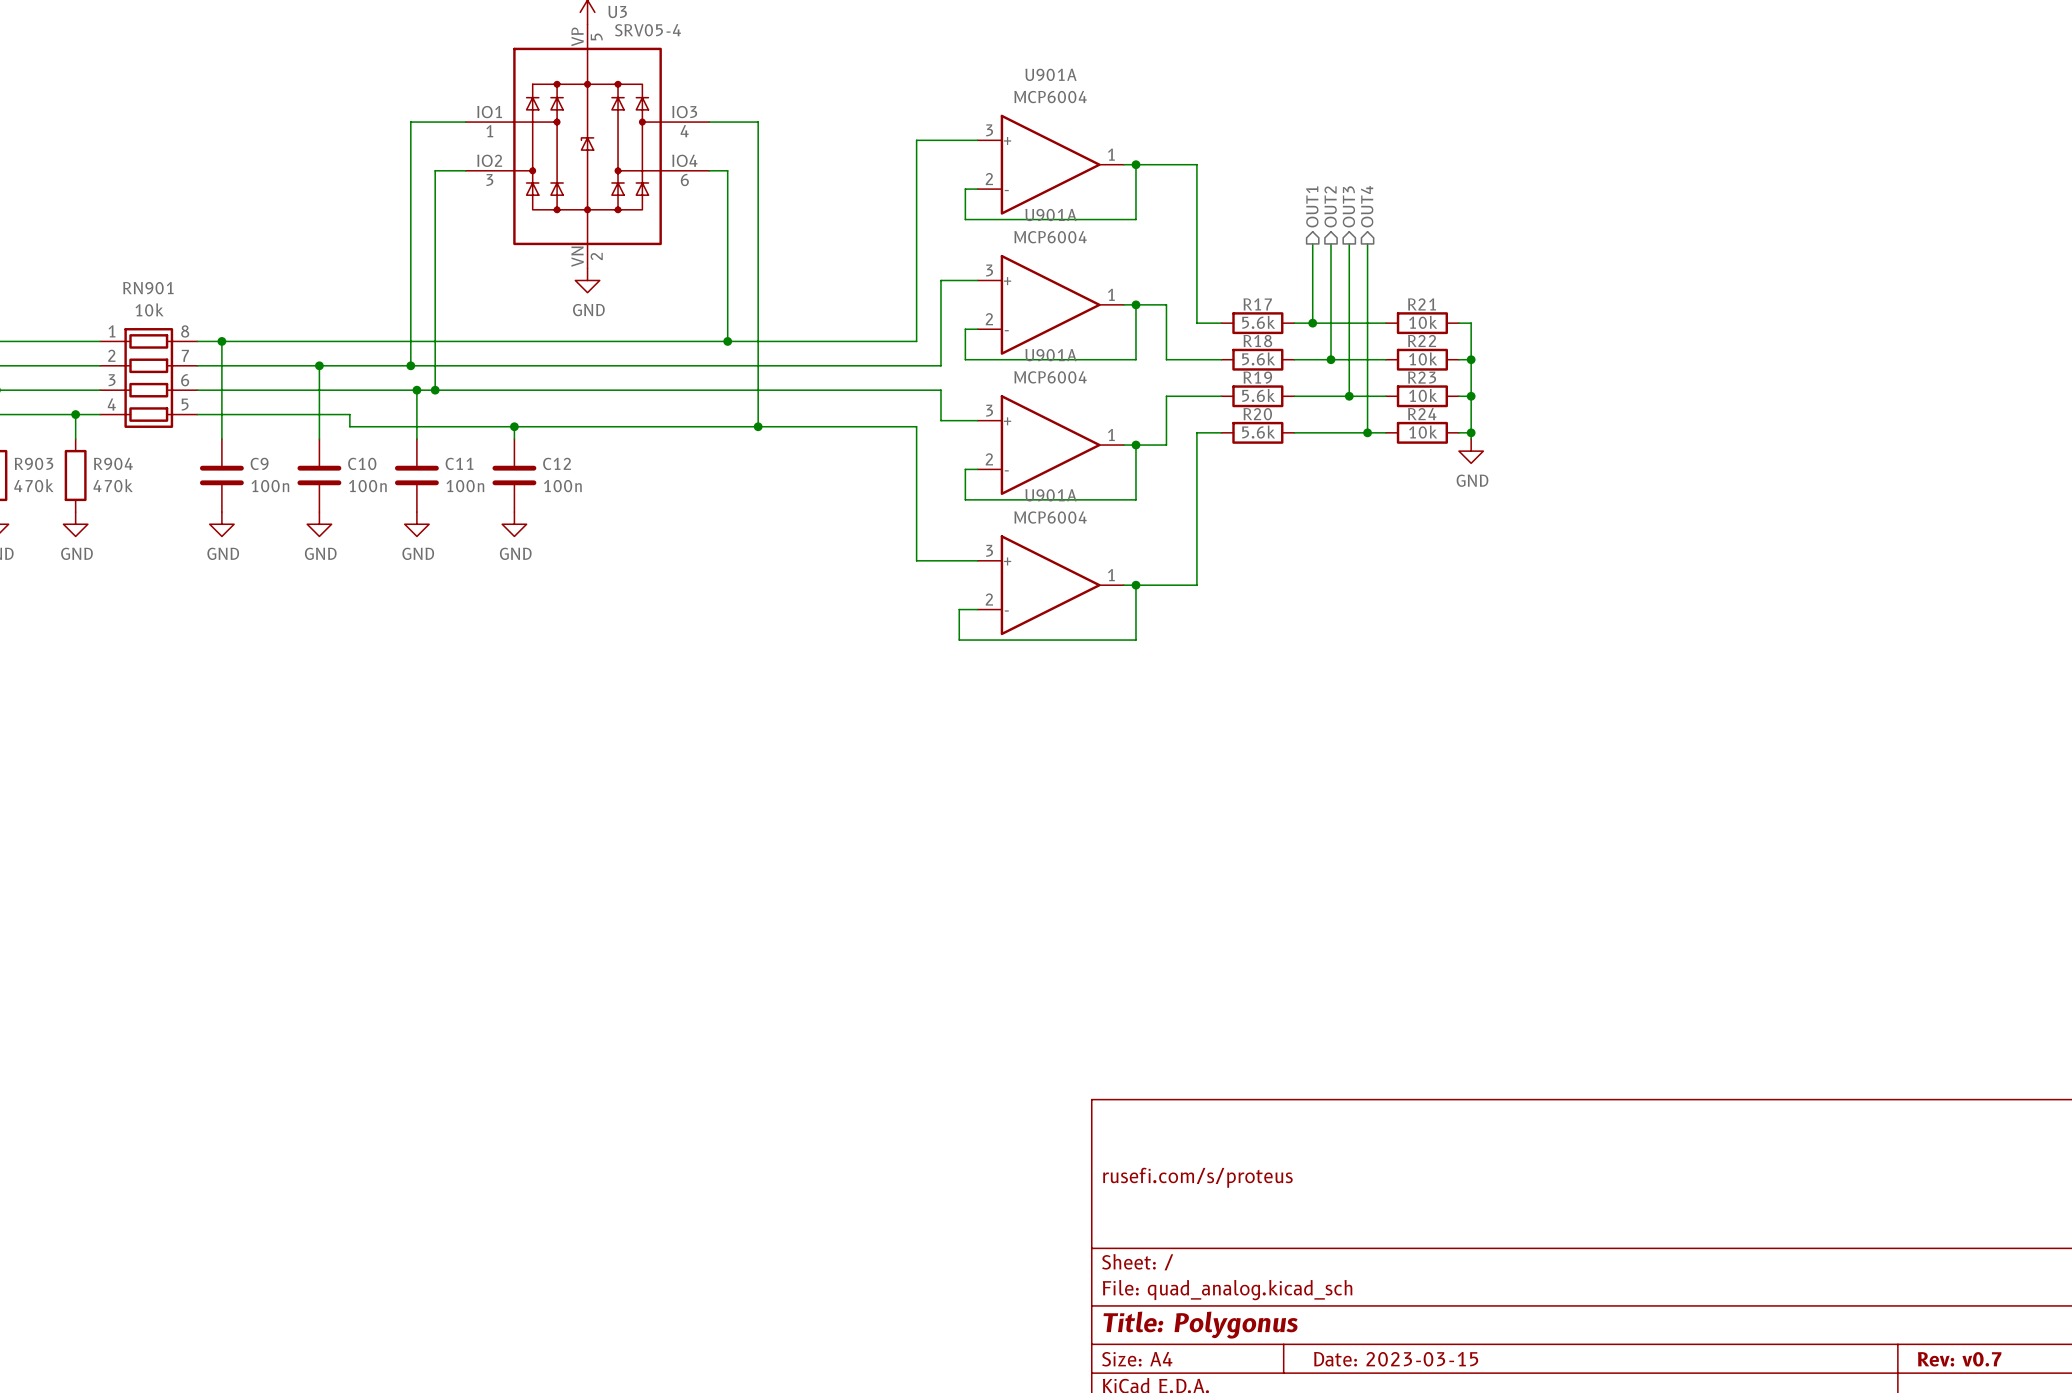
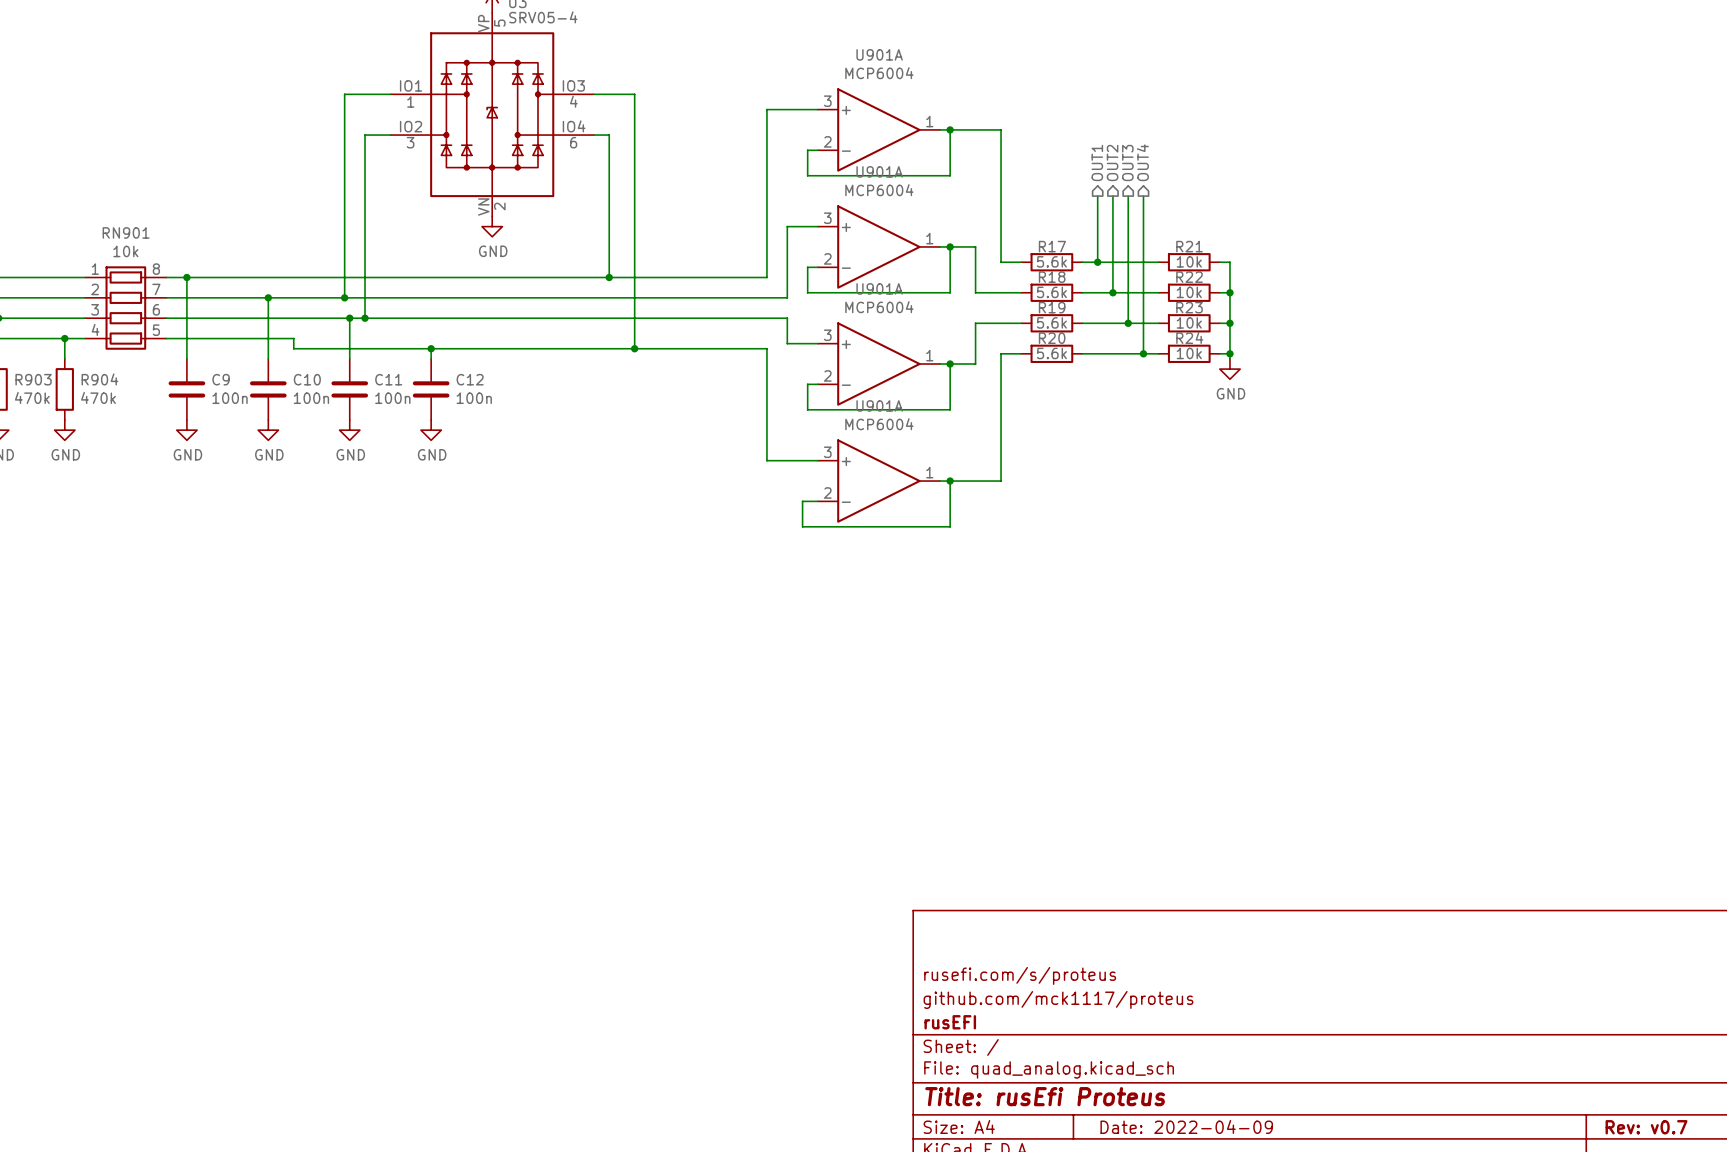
title block: none -> github.com/mck1117/proteus (1058, 999)
title block: none -> rusEFI (950, 1022)
title block: Title: Polygonus (1200, 1325) -> Title: rusEfi Proteus (1045, 1096)
title block: Date: 2023-03-15 (1396, 1359) -> Date: 2022-04-09 (1186, 1126)

